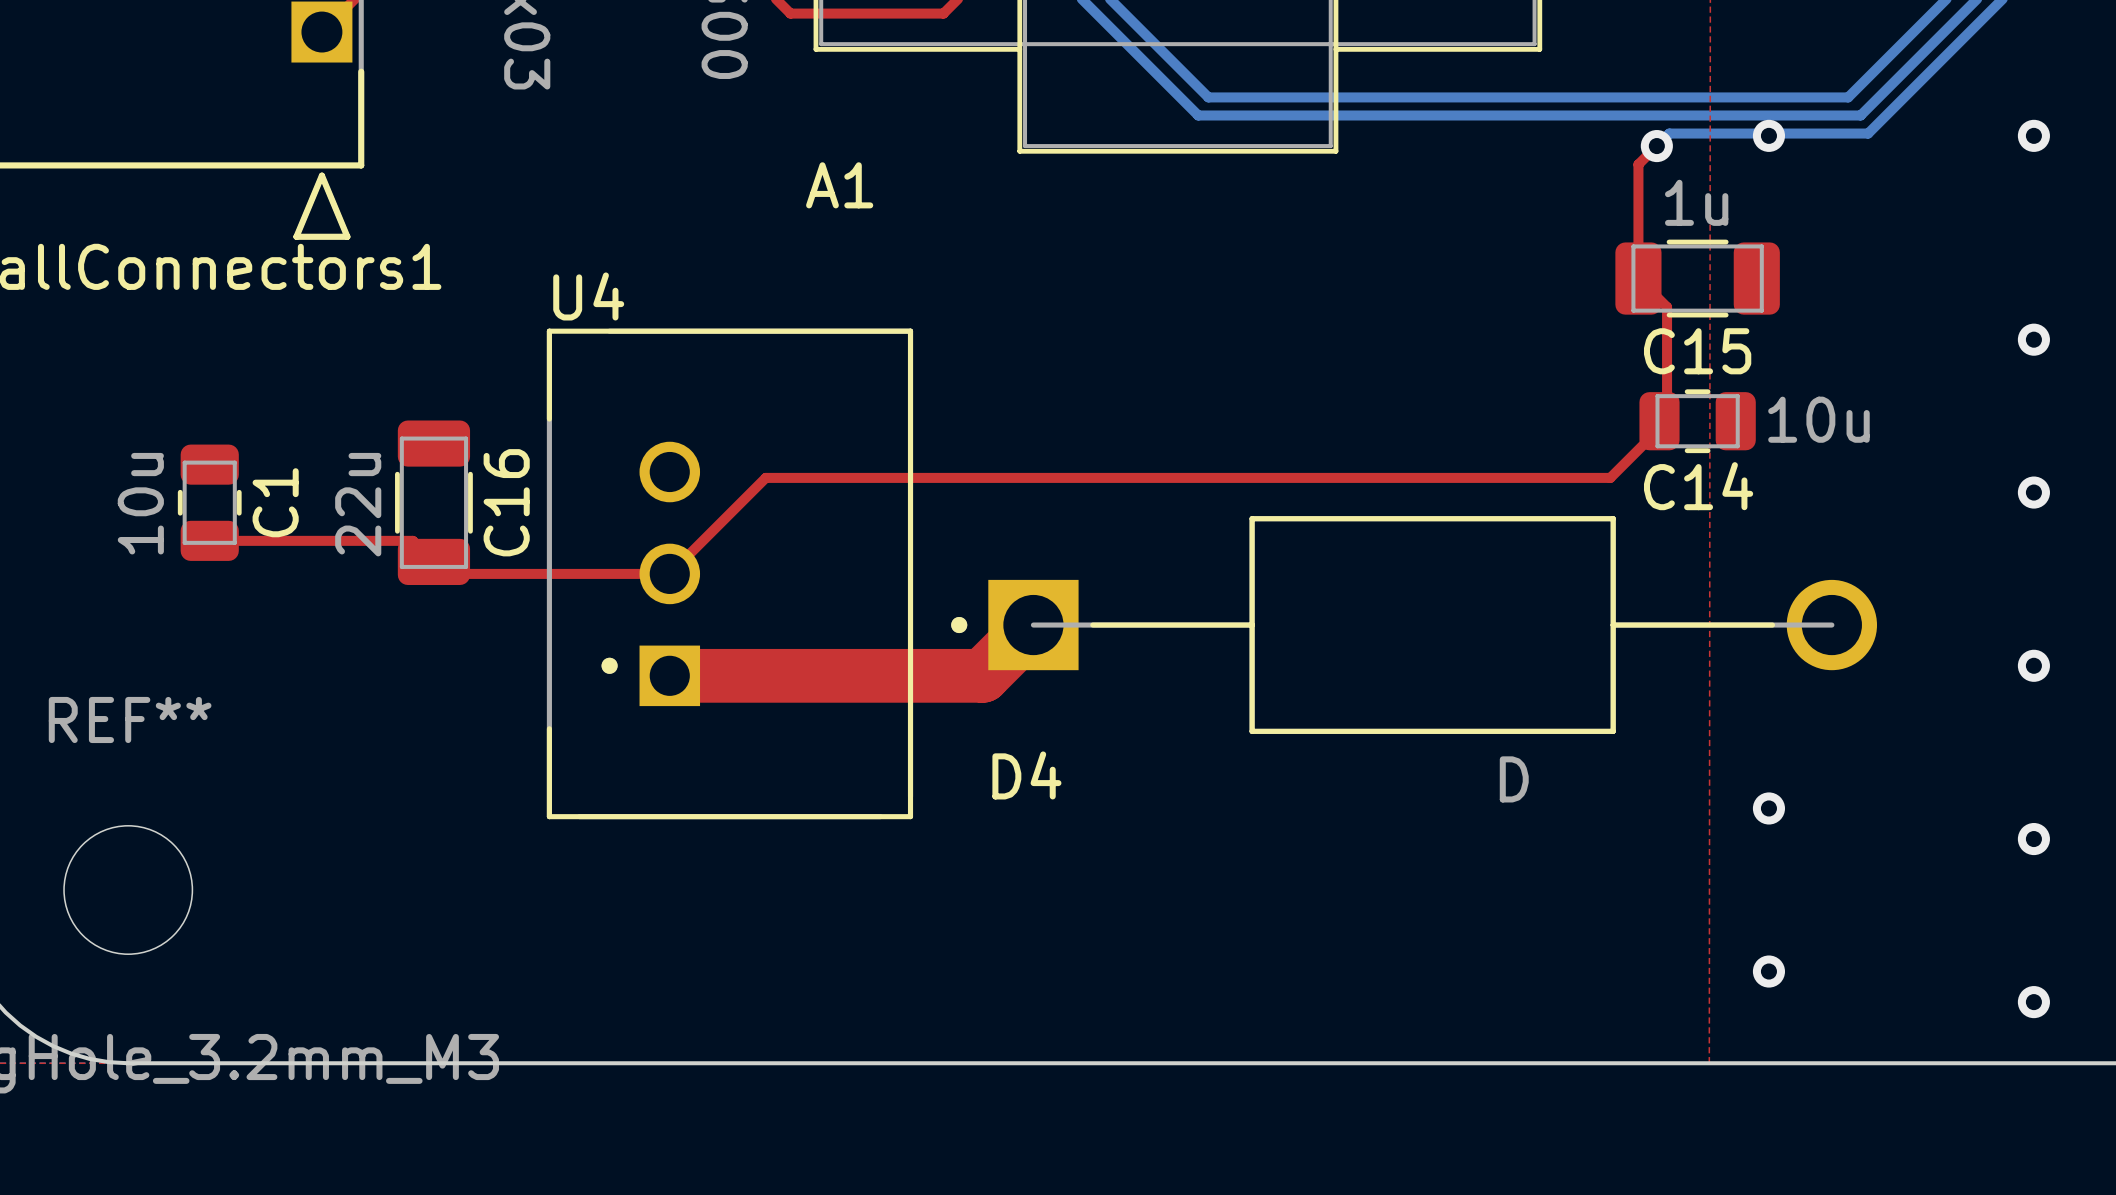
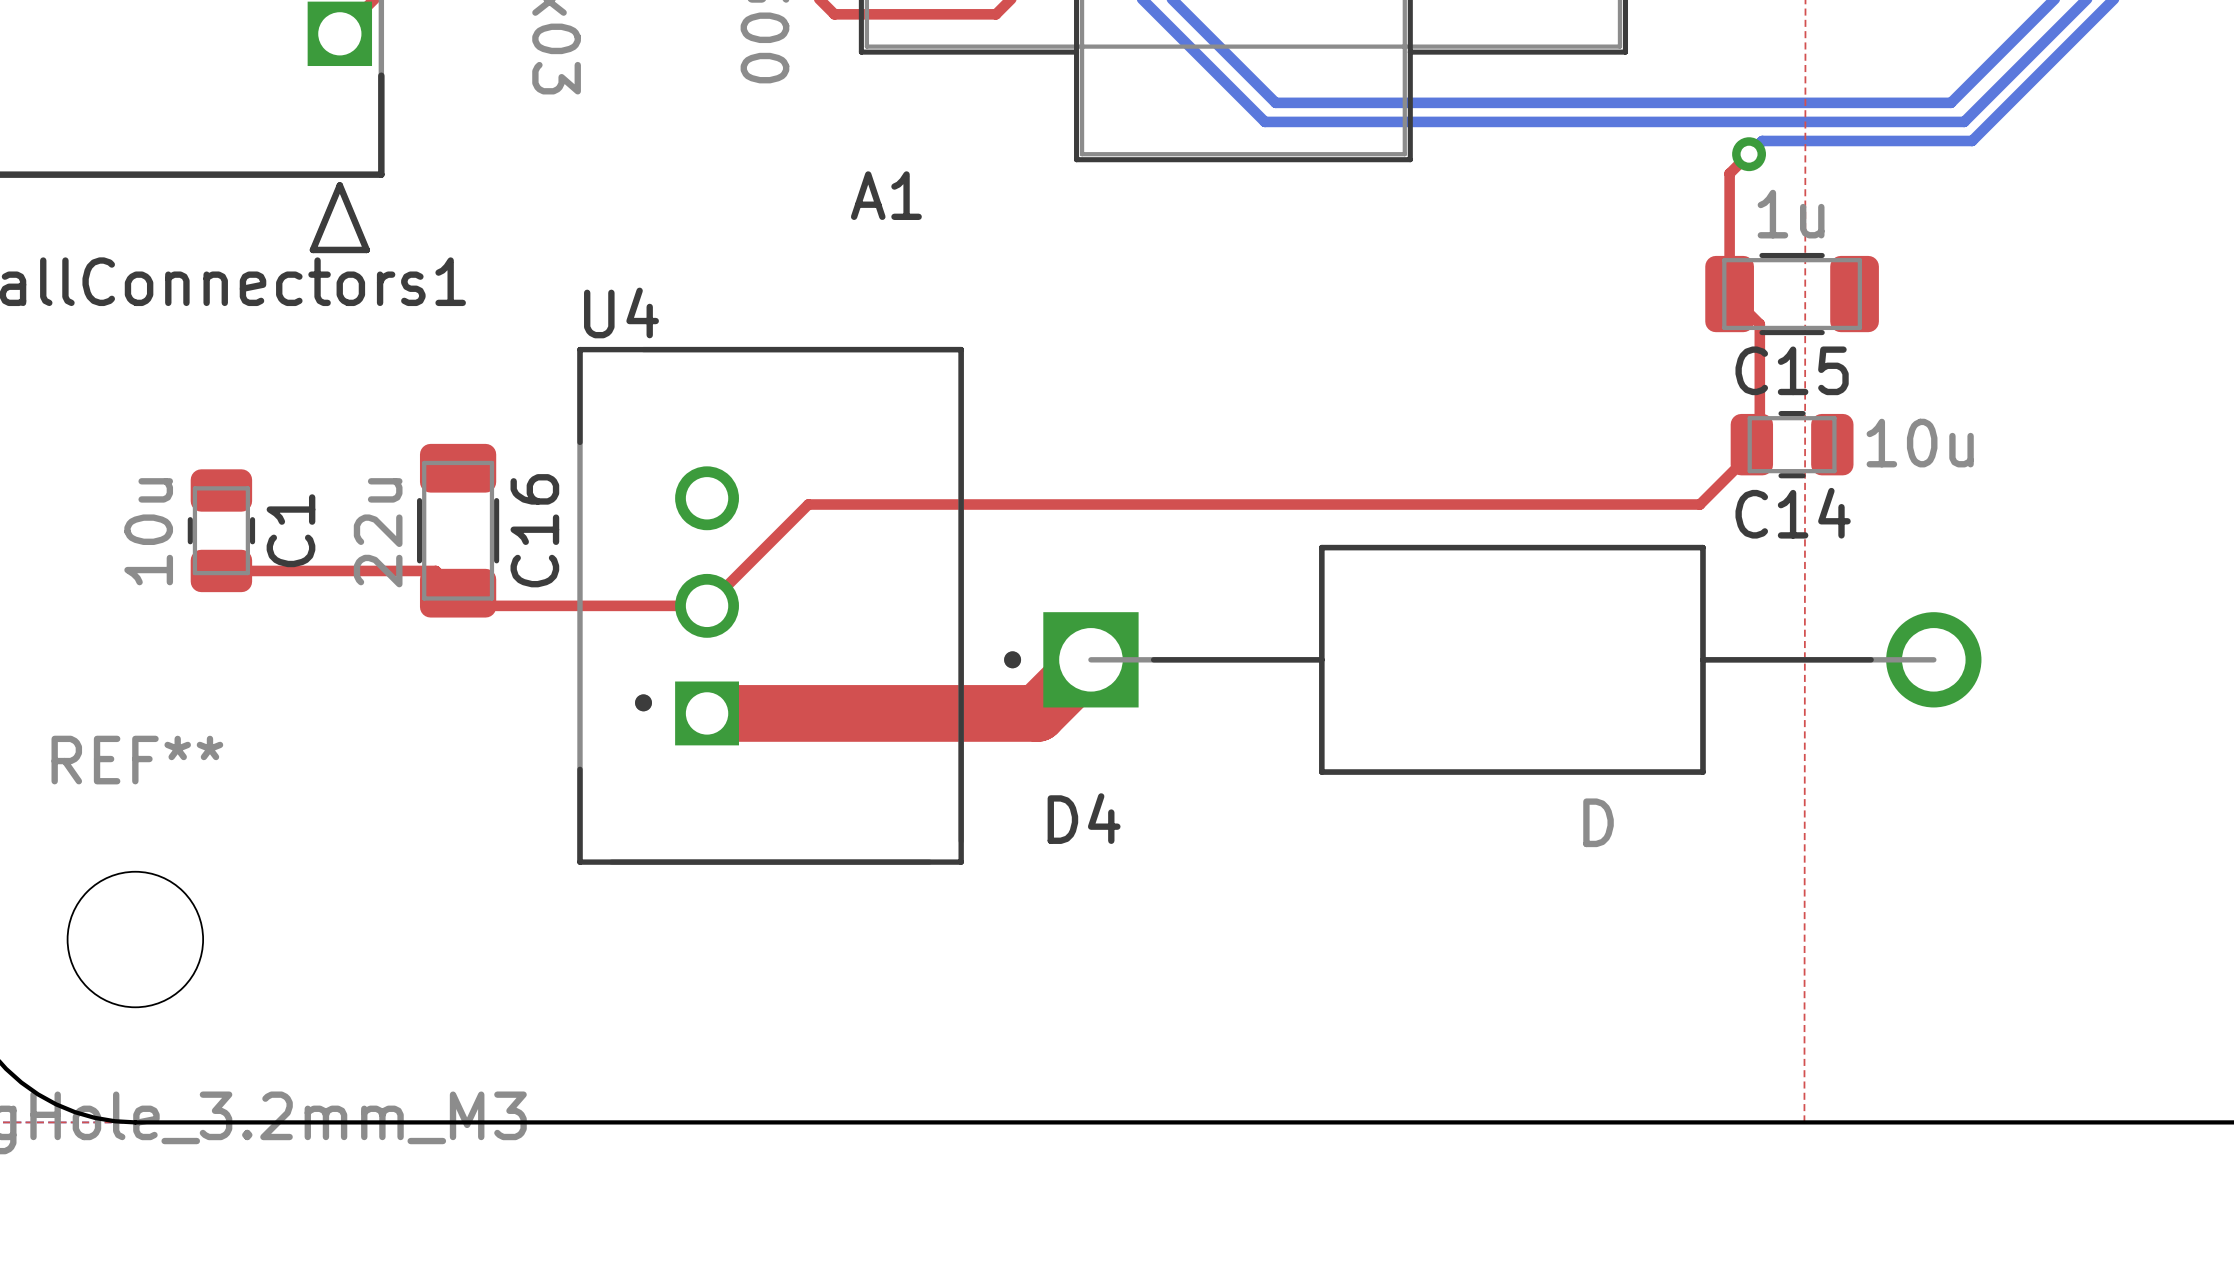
via: (1768, 135) -> none
via: (2033, 135) -> none
via: (2033, 339) -> none
via: (2033, 492) -> none
via: (2033, 665) -> none
via: (1768, 808) -> none
via: (2033, 839) -> none
via: (1768, 971) -> none
via: (2033, 1002) -> none

